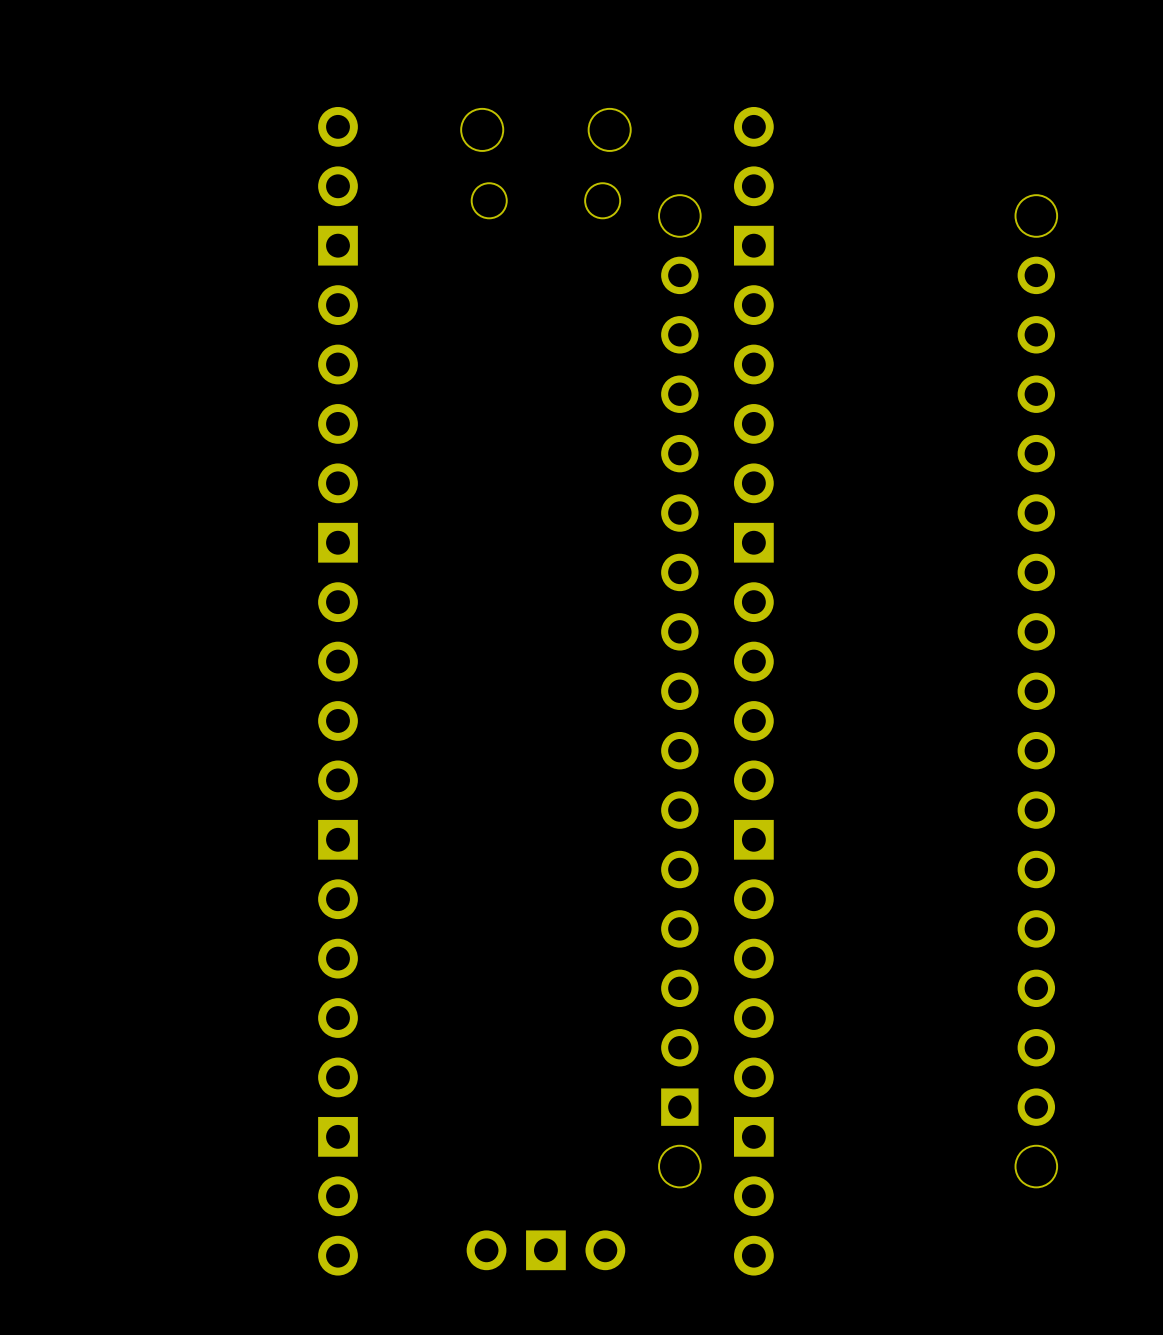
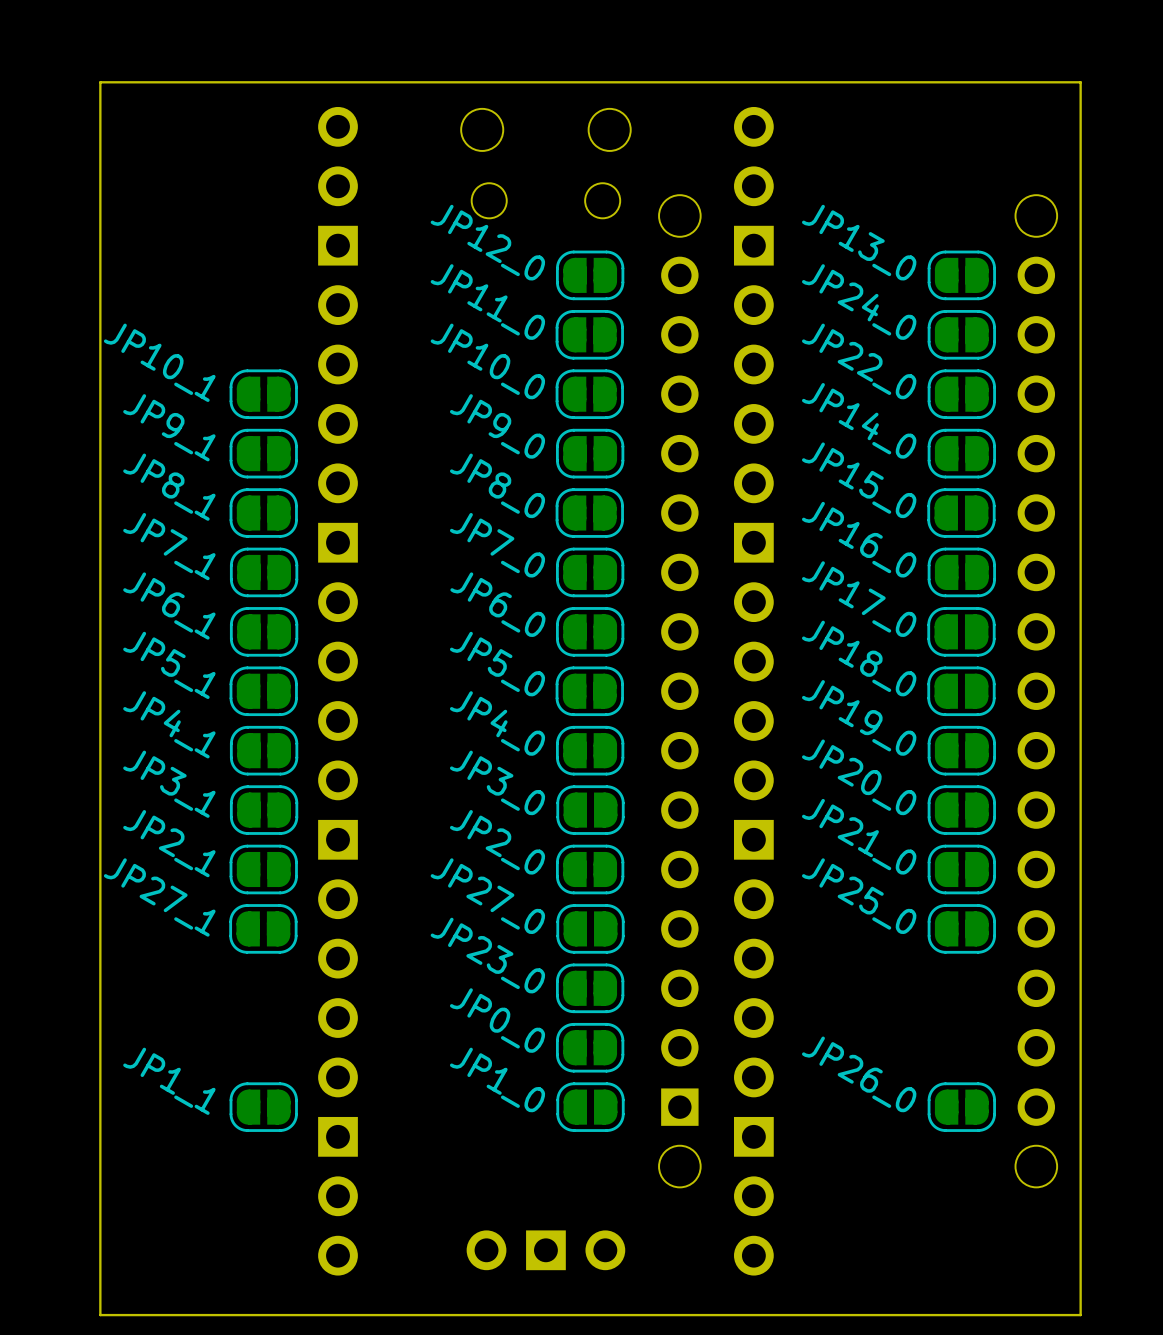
board edge: none -> (1080, 82) (100, 82) (100, 1315) (1080, 1315) (1080, 82)
JP12_0: none -> (590, 275)
JP13_0: none -> (961, 275)
JP11_0: none -> (589, 334)
JP24_0: none -> (961, 334)
JP10_1: none -> (263, 394)
JP10_0: none -> (589, 394)
JP22_0: none -> (961, 394)
JP9_1: none -> (263, 453)
JP9_0: none -> (590, 453)
JP14_0: none -> (961, 453)
JP8_1: none -> (263, 513)
JP8_0: none -> (589, 513)
JP15_0: none -> (961, 513)
JP7_1: none -> (264, 572)
JP7_0: none -> (590, 572)
JP16_0: none -> (961, 572)
JP6_1: none -> (264, 631)
JP6_0: none -> (590, 631)
JP17_0: none -> (961, 631)
JP5_1: none -> (263, 691)
JP5_0: none -> (589, 691)
JP18_0: none -> (961, 691)
JP4_1: none -> (264, 750)
JP4_0: none -> (590, 750)
JP19_0: none -> (961, 750)
JP3_1: none -> (264, 810)
JP3_0: none -> (590, 810)
JP20_0: none -> (961, 810)
JP2_1: none -> (263, 869)
JP2_0: none -> (590, 869)
JP21_0: none -> (961, 869)
JP27_1: none -> (263, 928)
JP27_0: none -> (590, 928)
JP25_0: none -> (961, 928)
JP23_0: none -> (590, 988)
JP0_0: none -> (590, 1047)
JP1_1: none -> (263, 1107)
JP1_0: none -> (590, 1107)
JP26_0: none -> (961, 1107)

